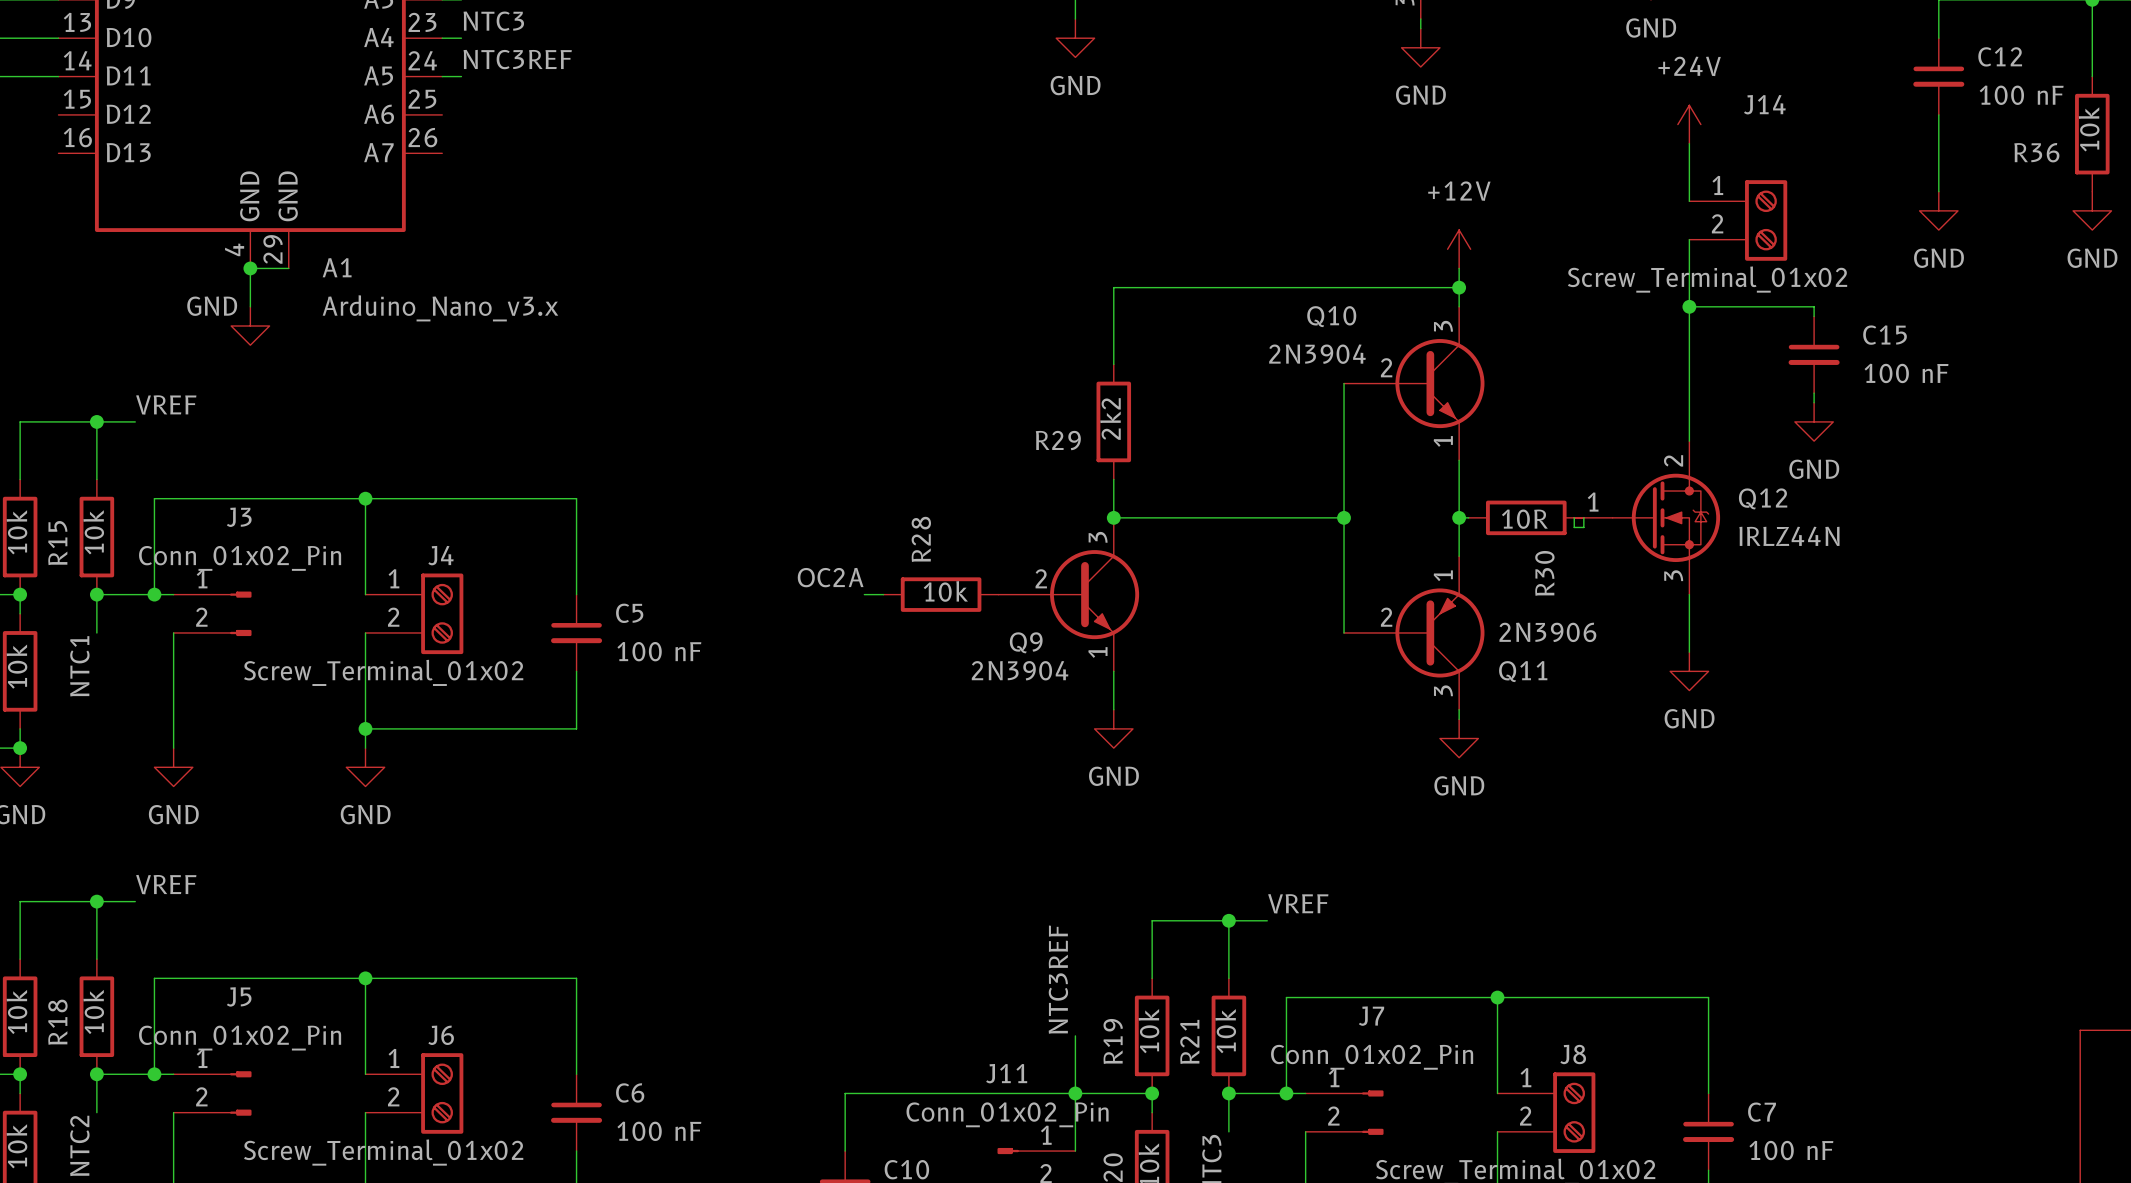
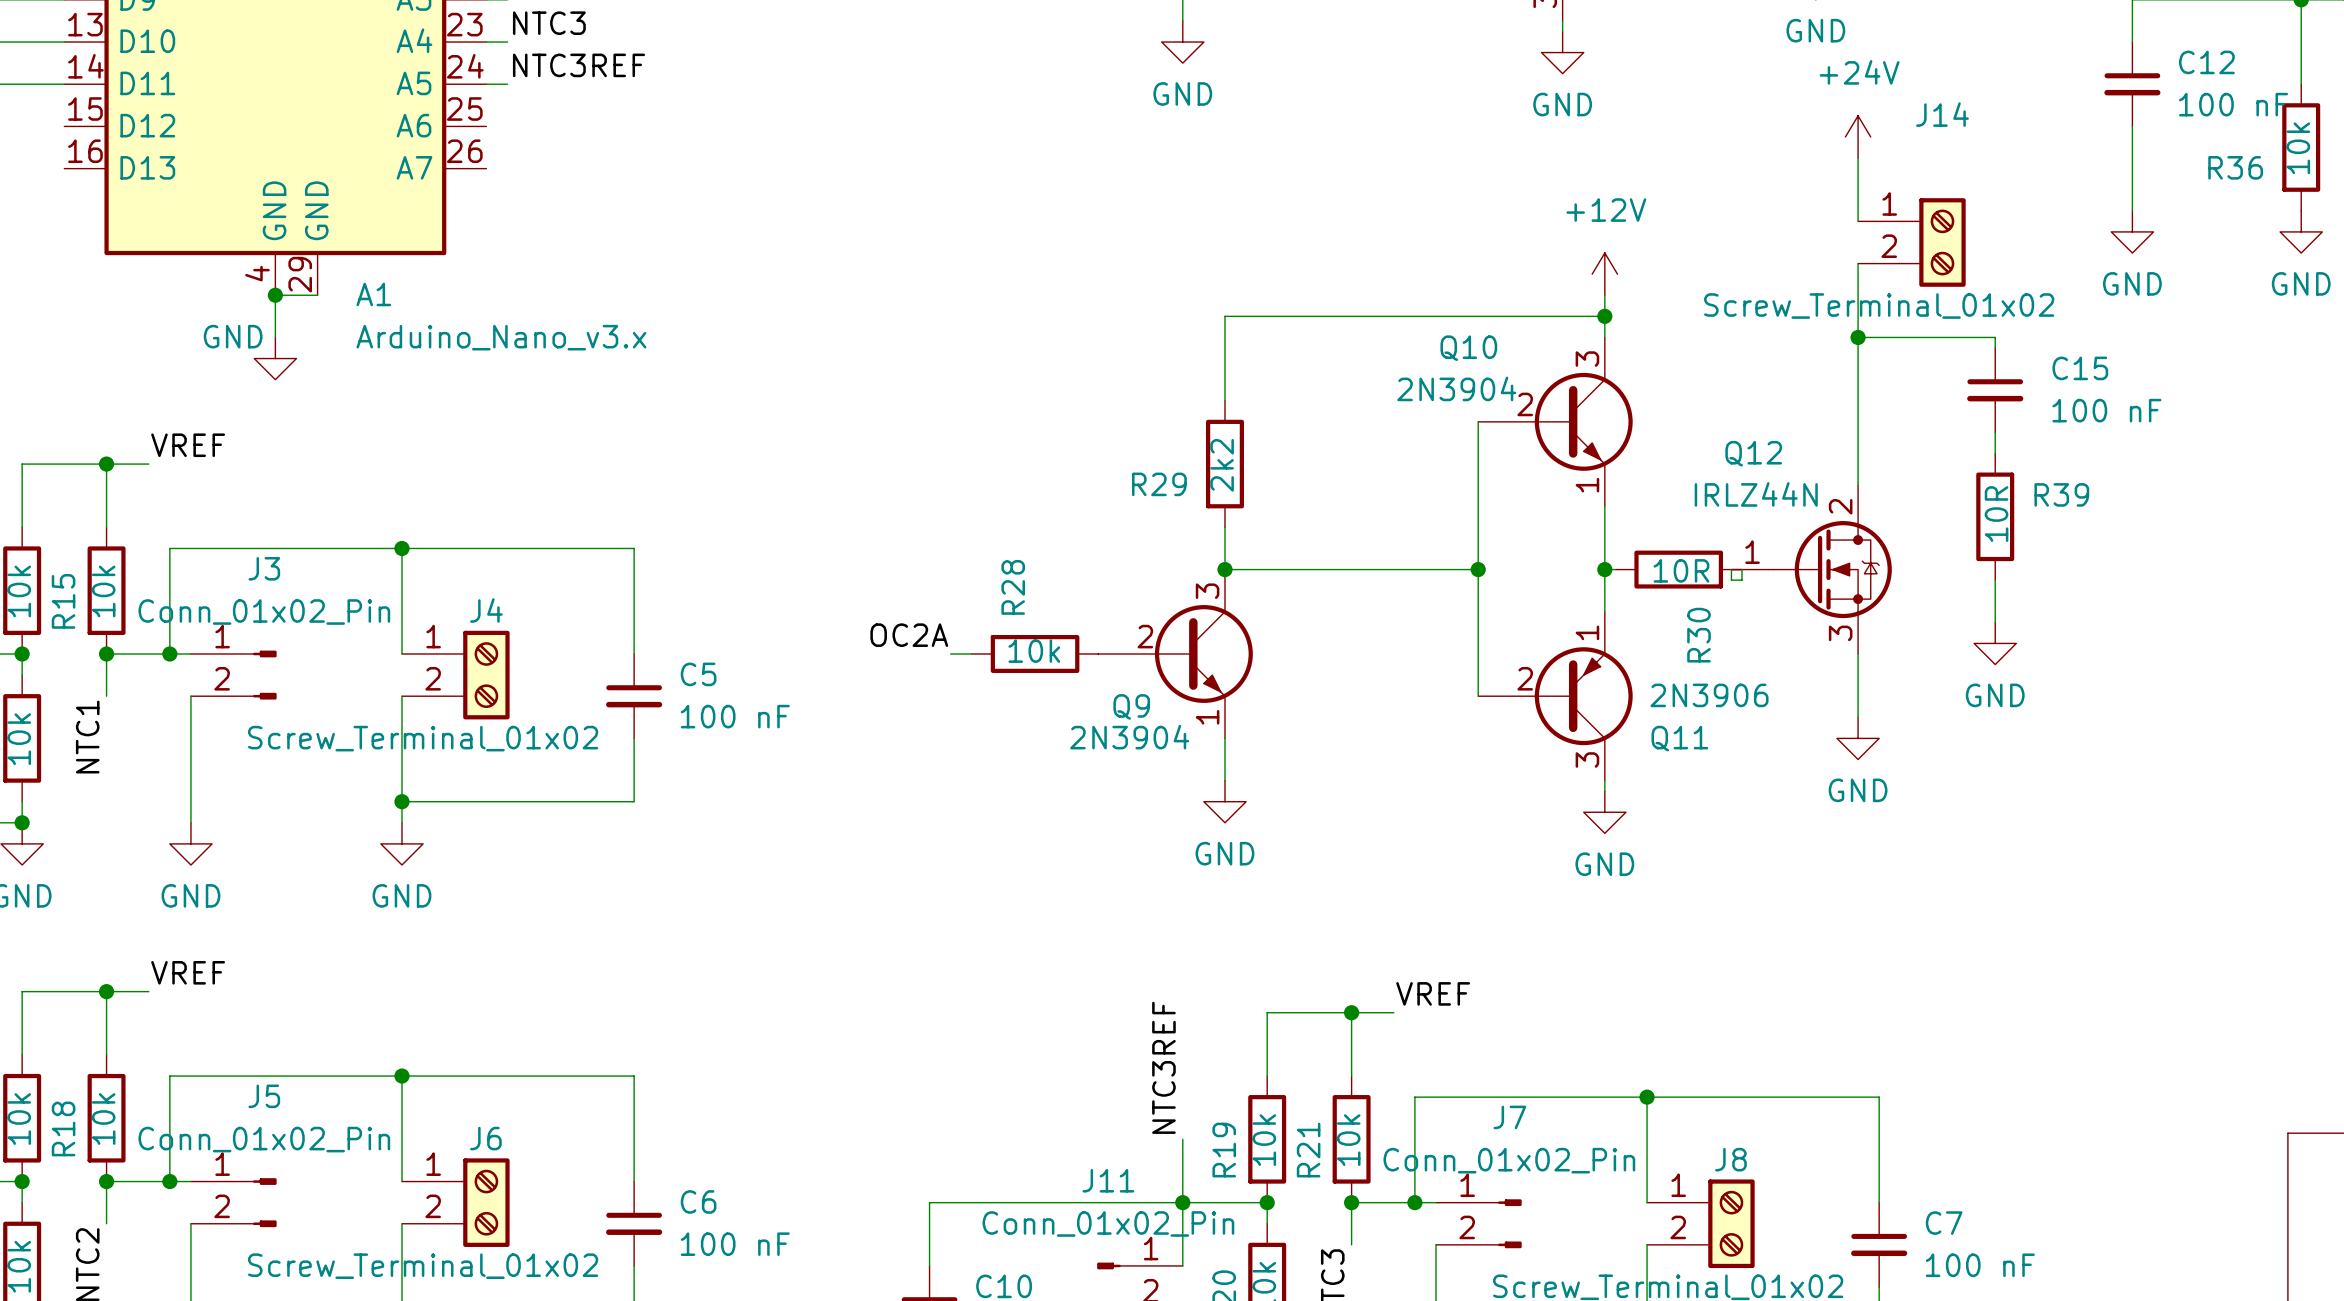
power symbol position: GND (1814, 421) -> GND (1995, 643)
R39: none -> 10R (1995, 516)
Q12 name position: Q12 (1763, 498) -> Q12 (1753, 453)
wire: none -> (1995, 580) (1995, 622)
Q12 value position: IRLZ44N (1789, 536) -> IRLZ44N (1756, 494)

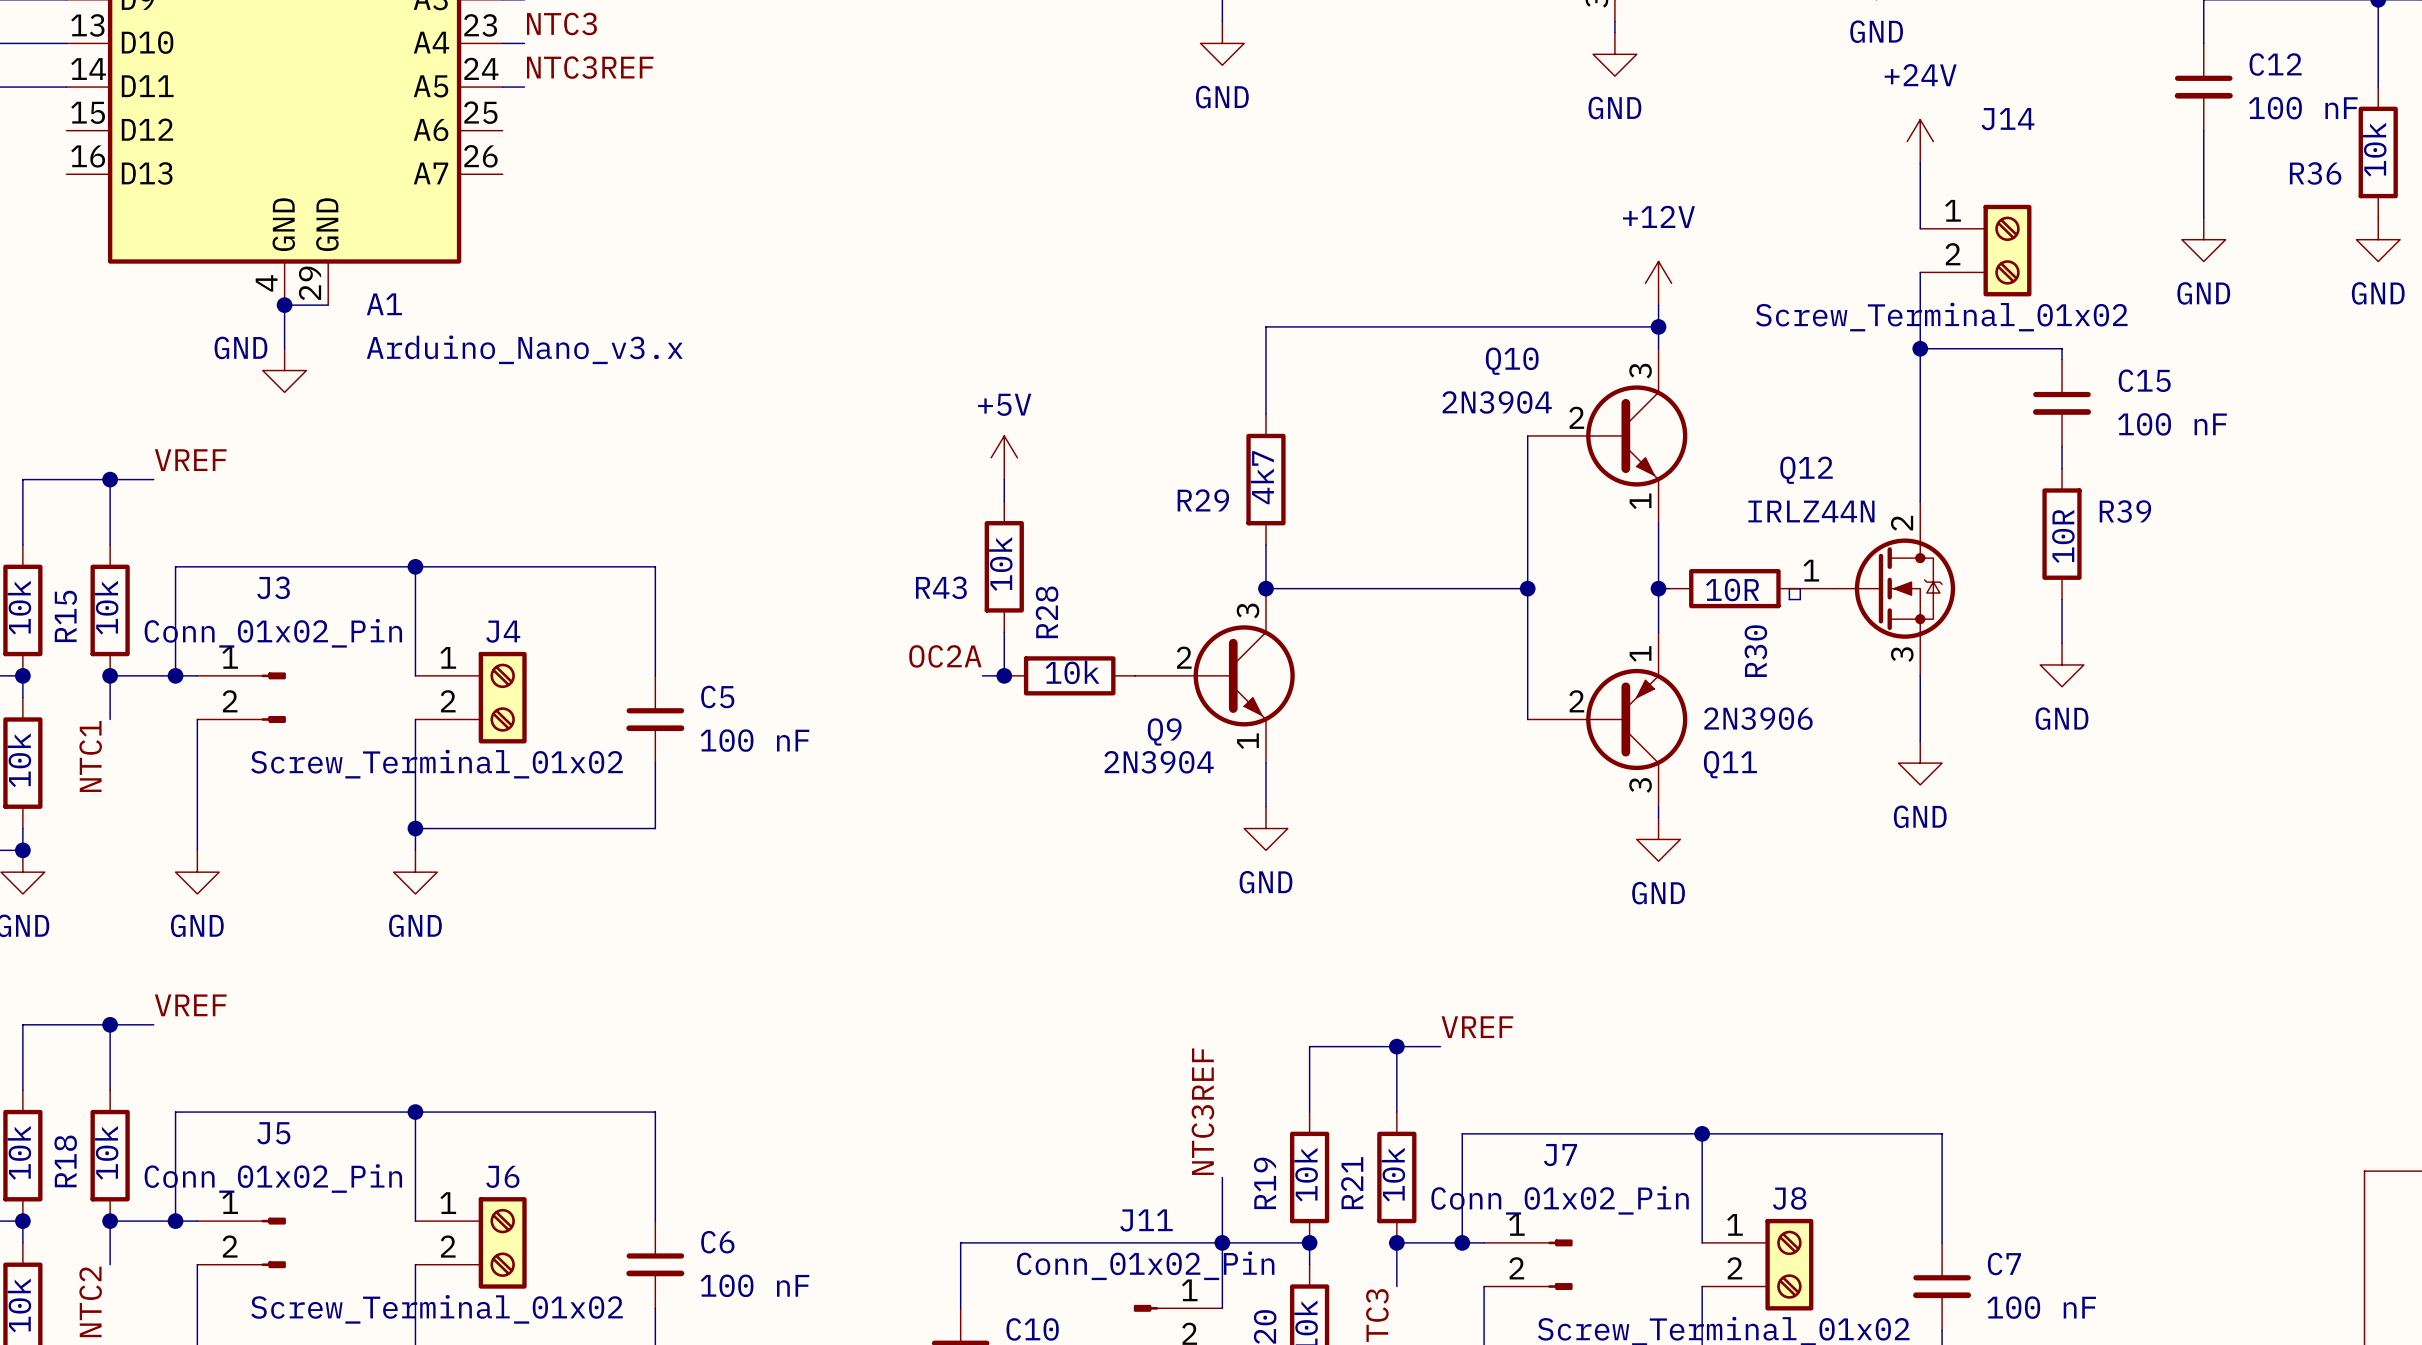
power symbol: none -> +5V (1004, 457)
wire: none -> (1004, 479) (1004, 501)
R29 value: 2k2 (1222, 465) -> 4k7 (1262, 477)
R43: none -> 10k (1004, 566)
wire: none -> (1004, 632) (1004, 675)
junction: none -> (1004, 675)

